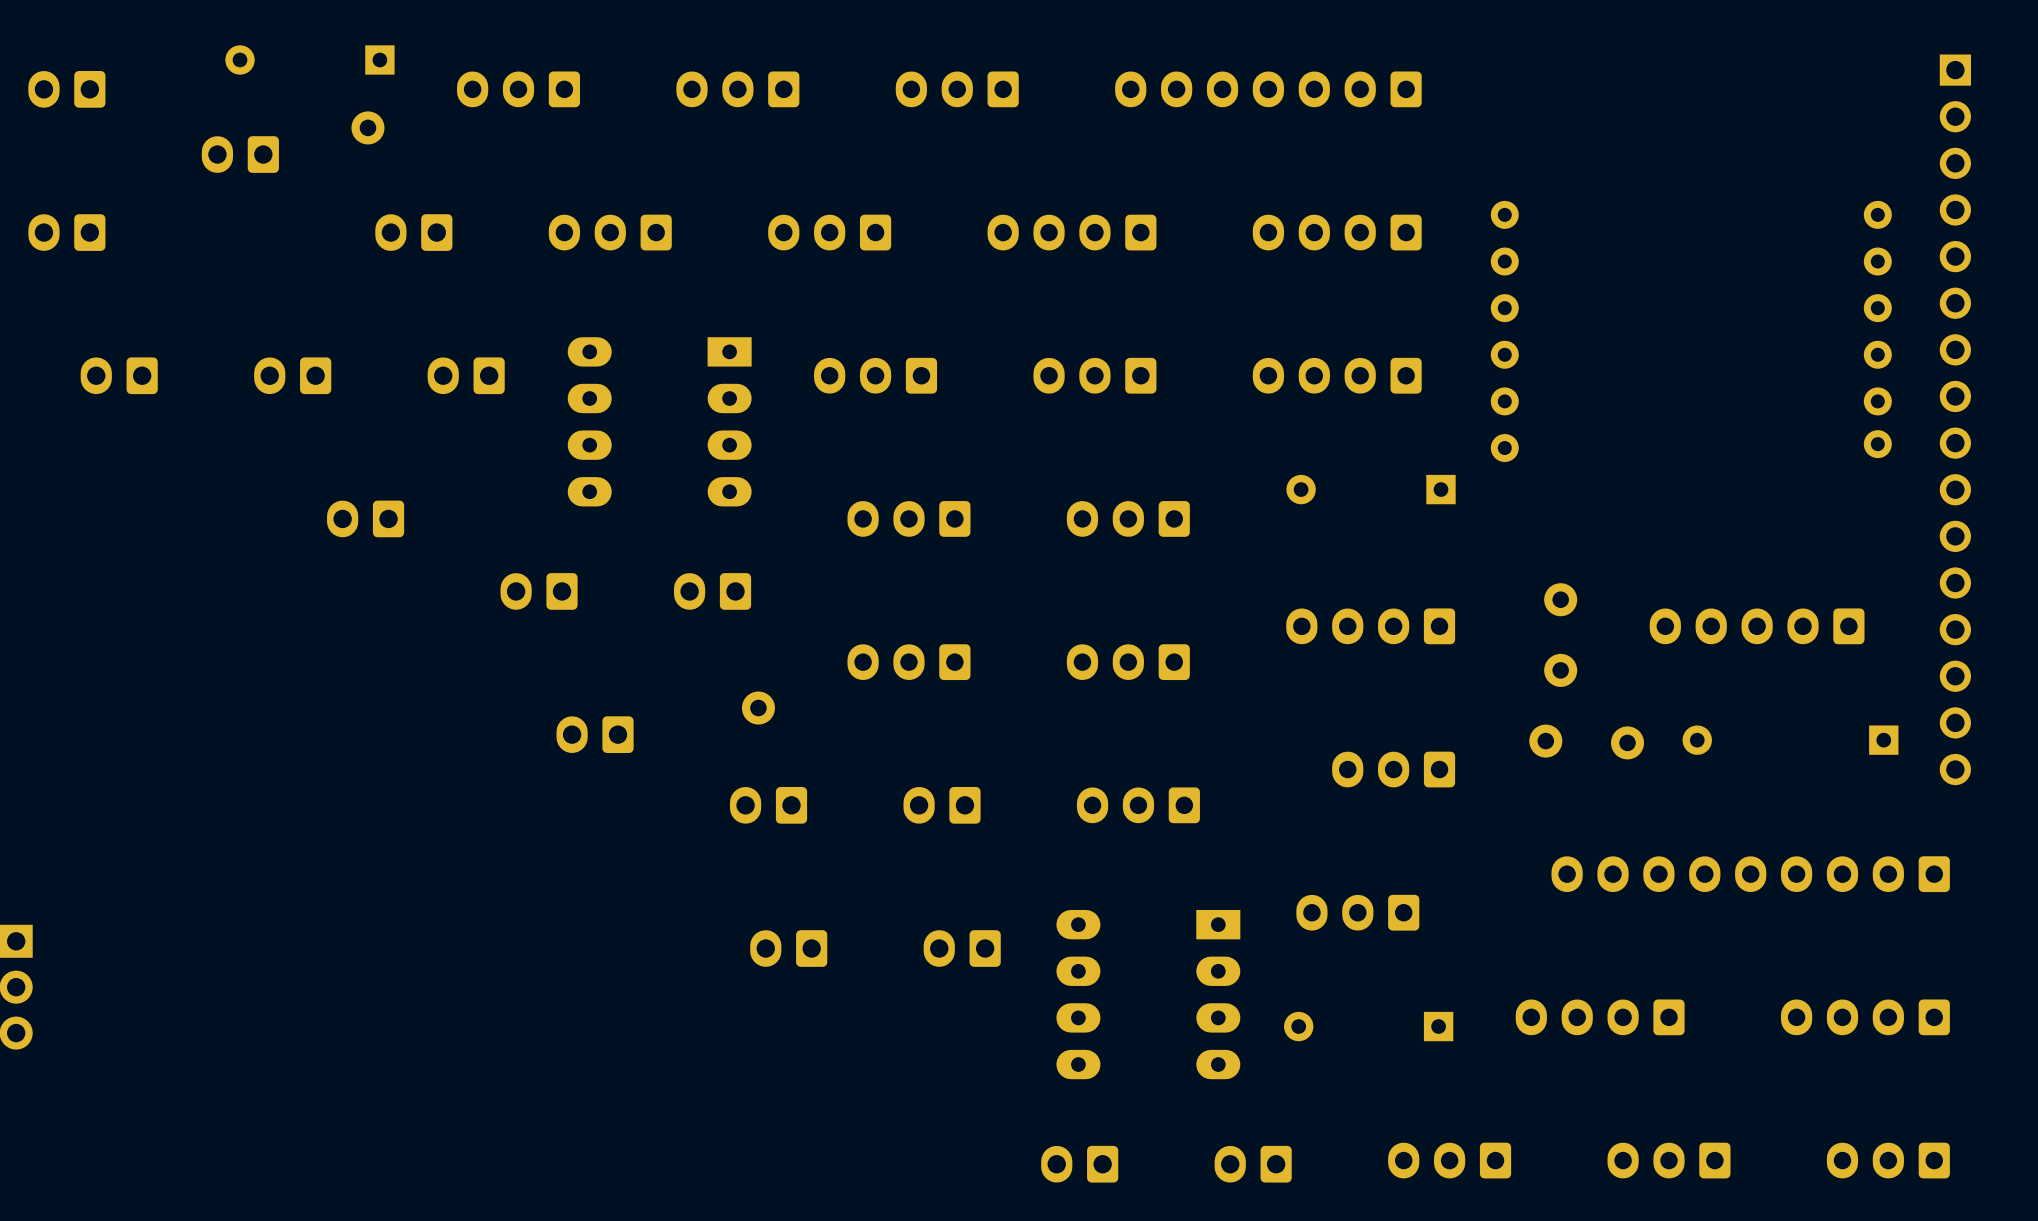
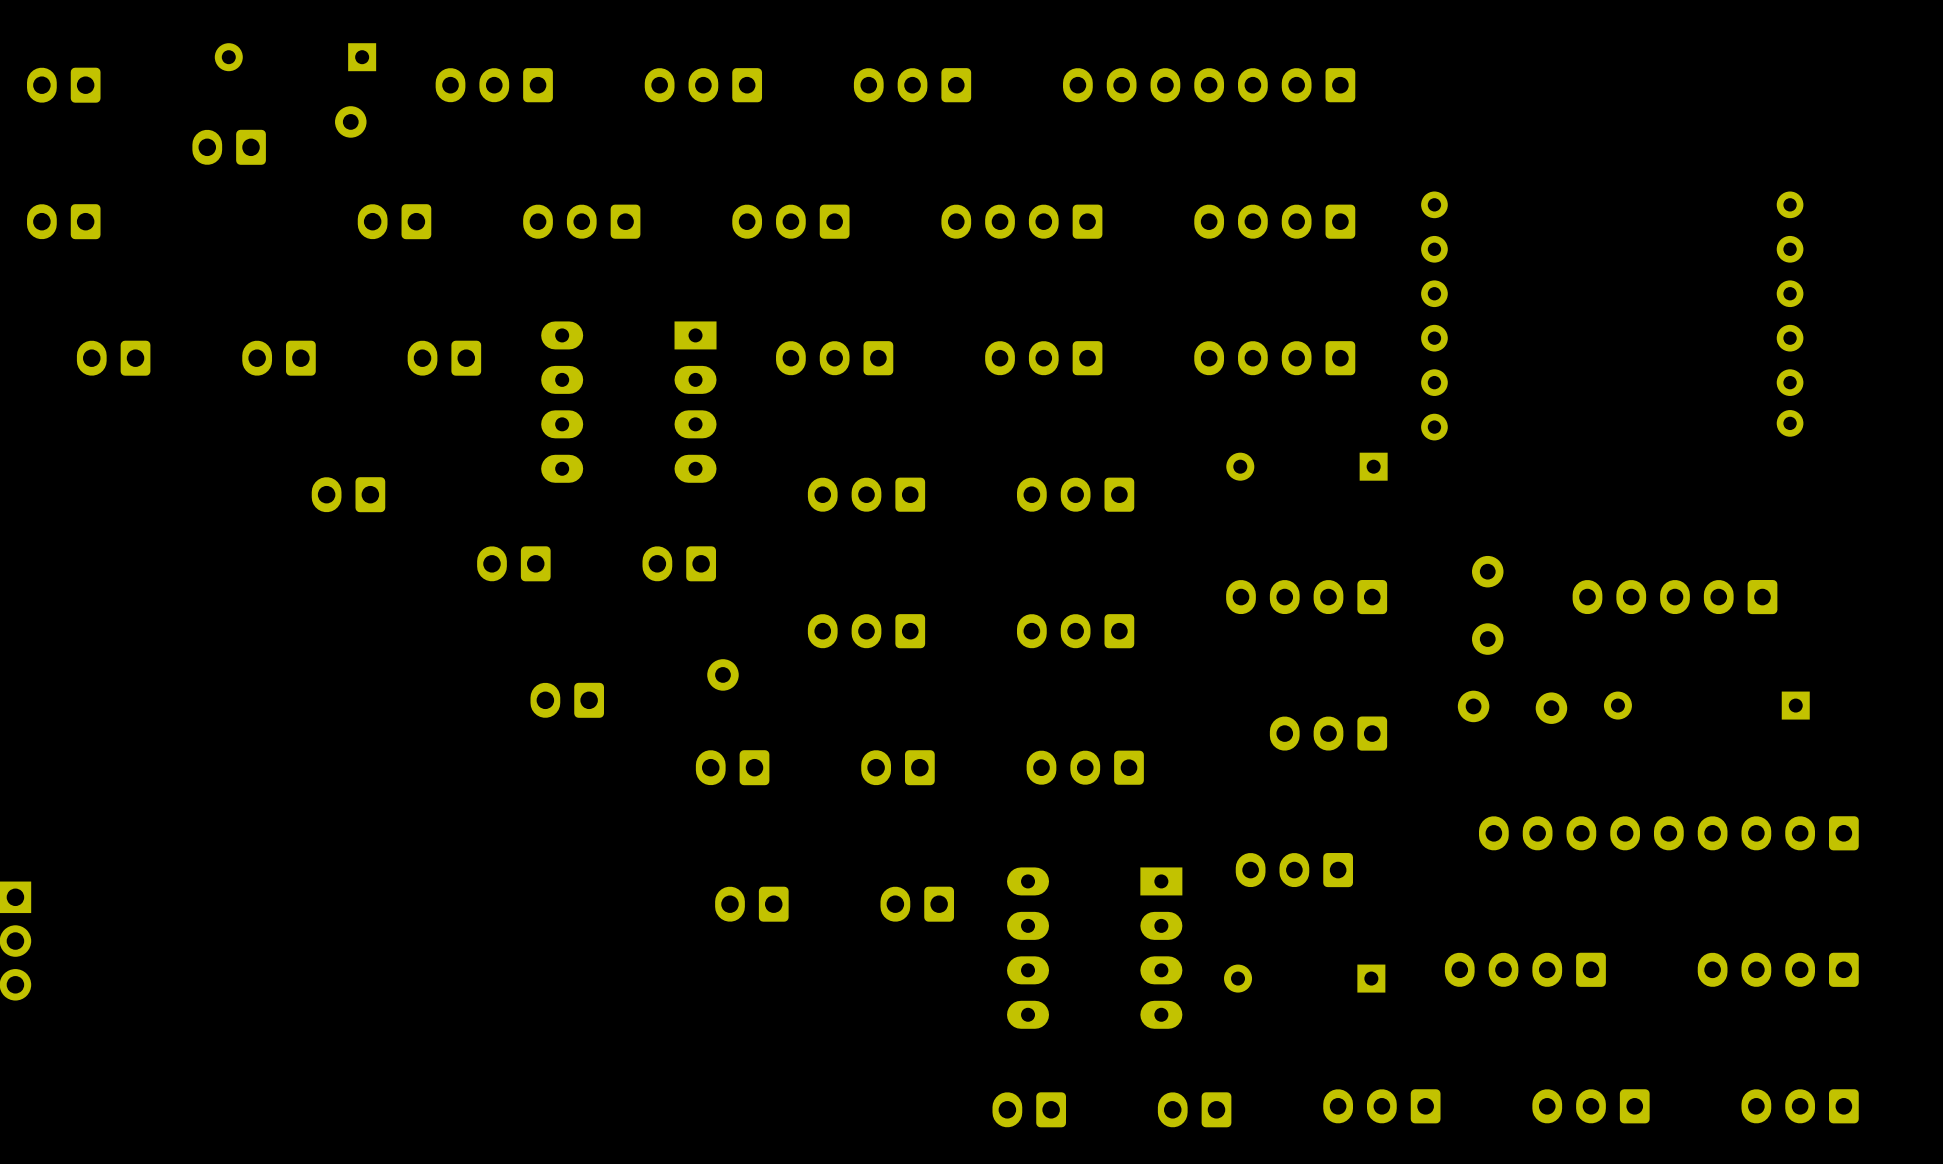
part: (1955, 419) -> none

